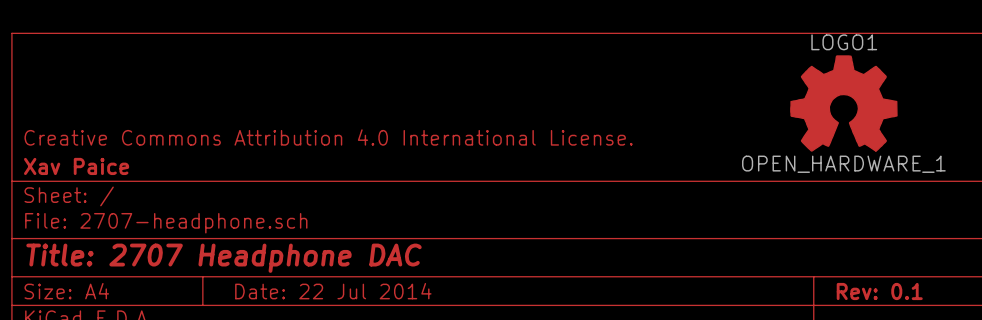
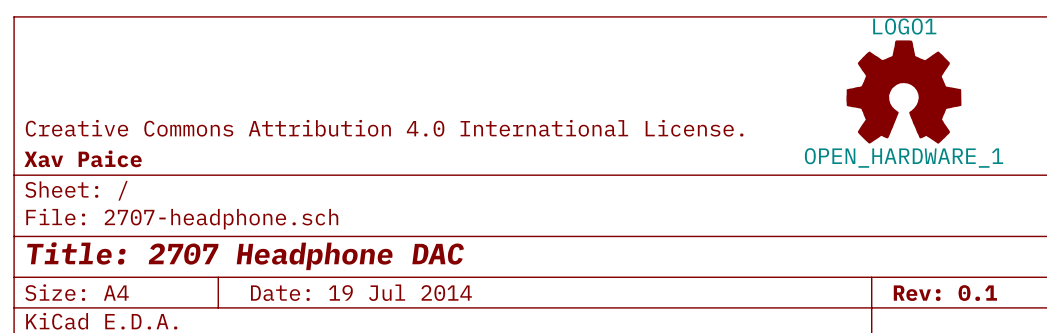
title block: Date: 22 Jul 2014 (333, 291) -> Date: 19 Jul 2014 (361, 292)

